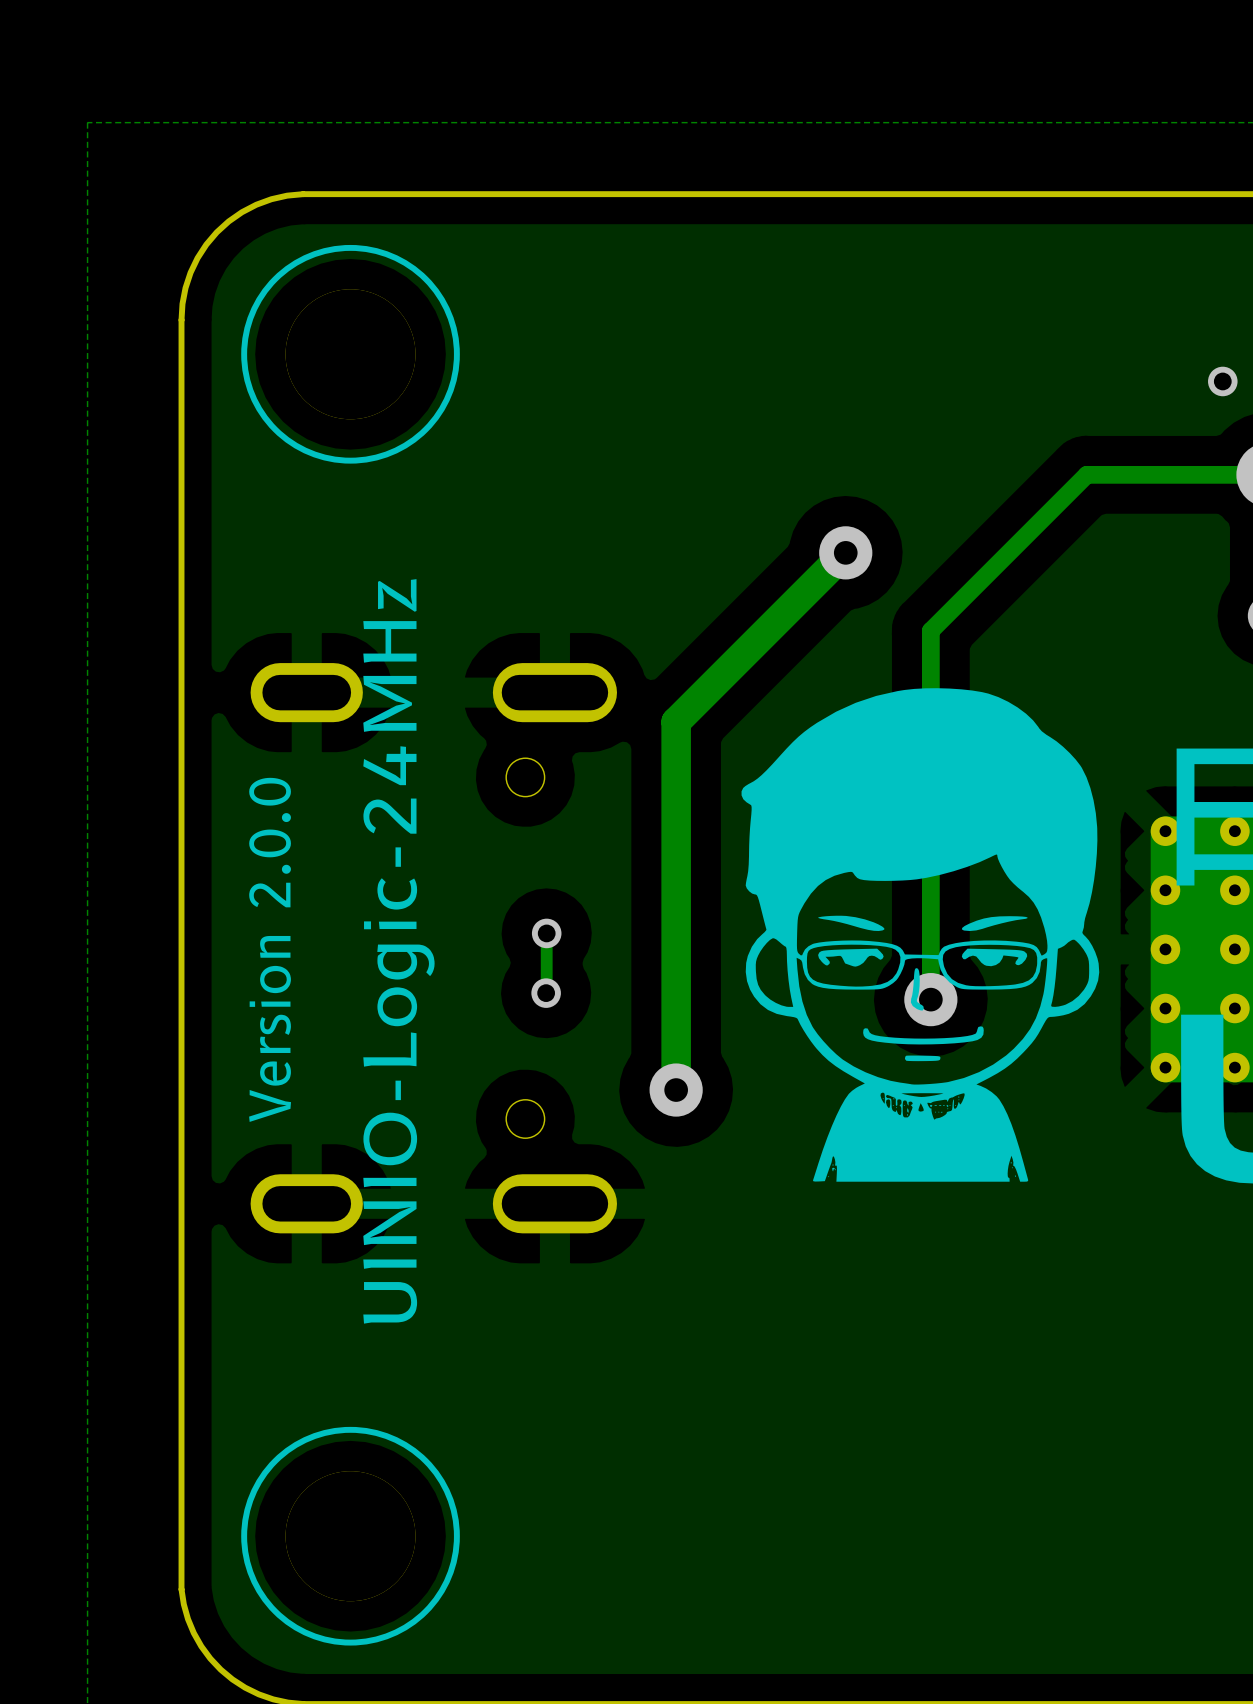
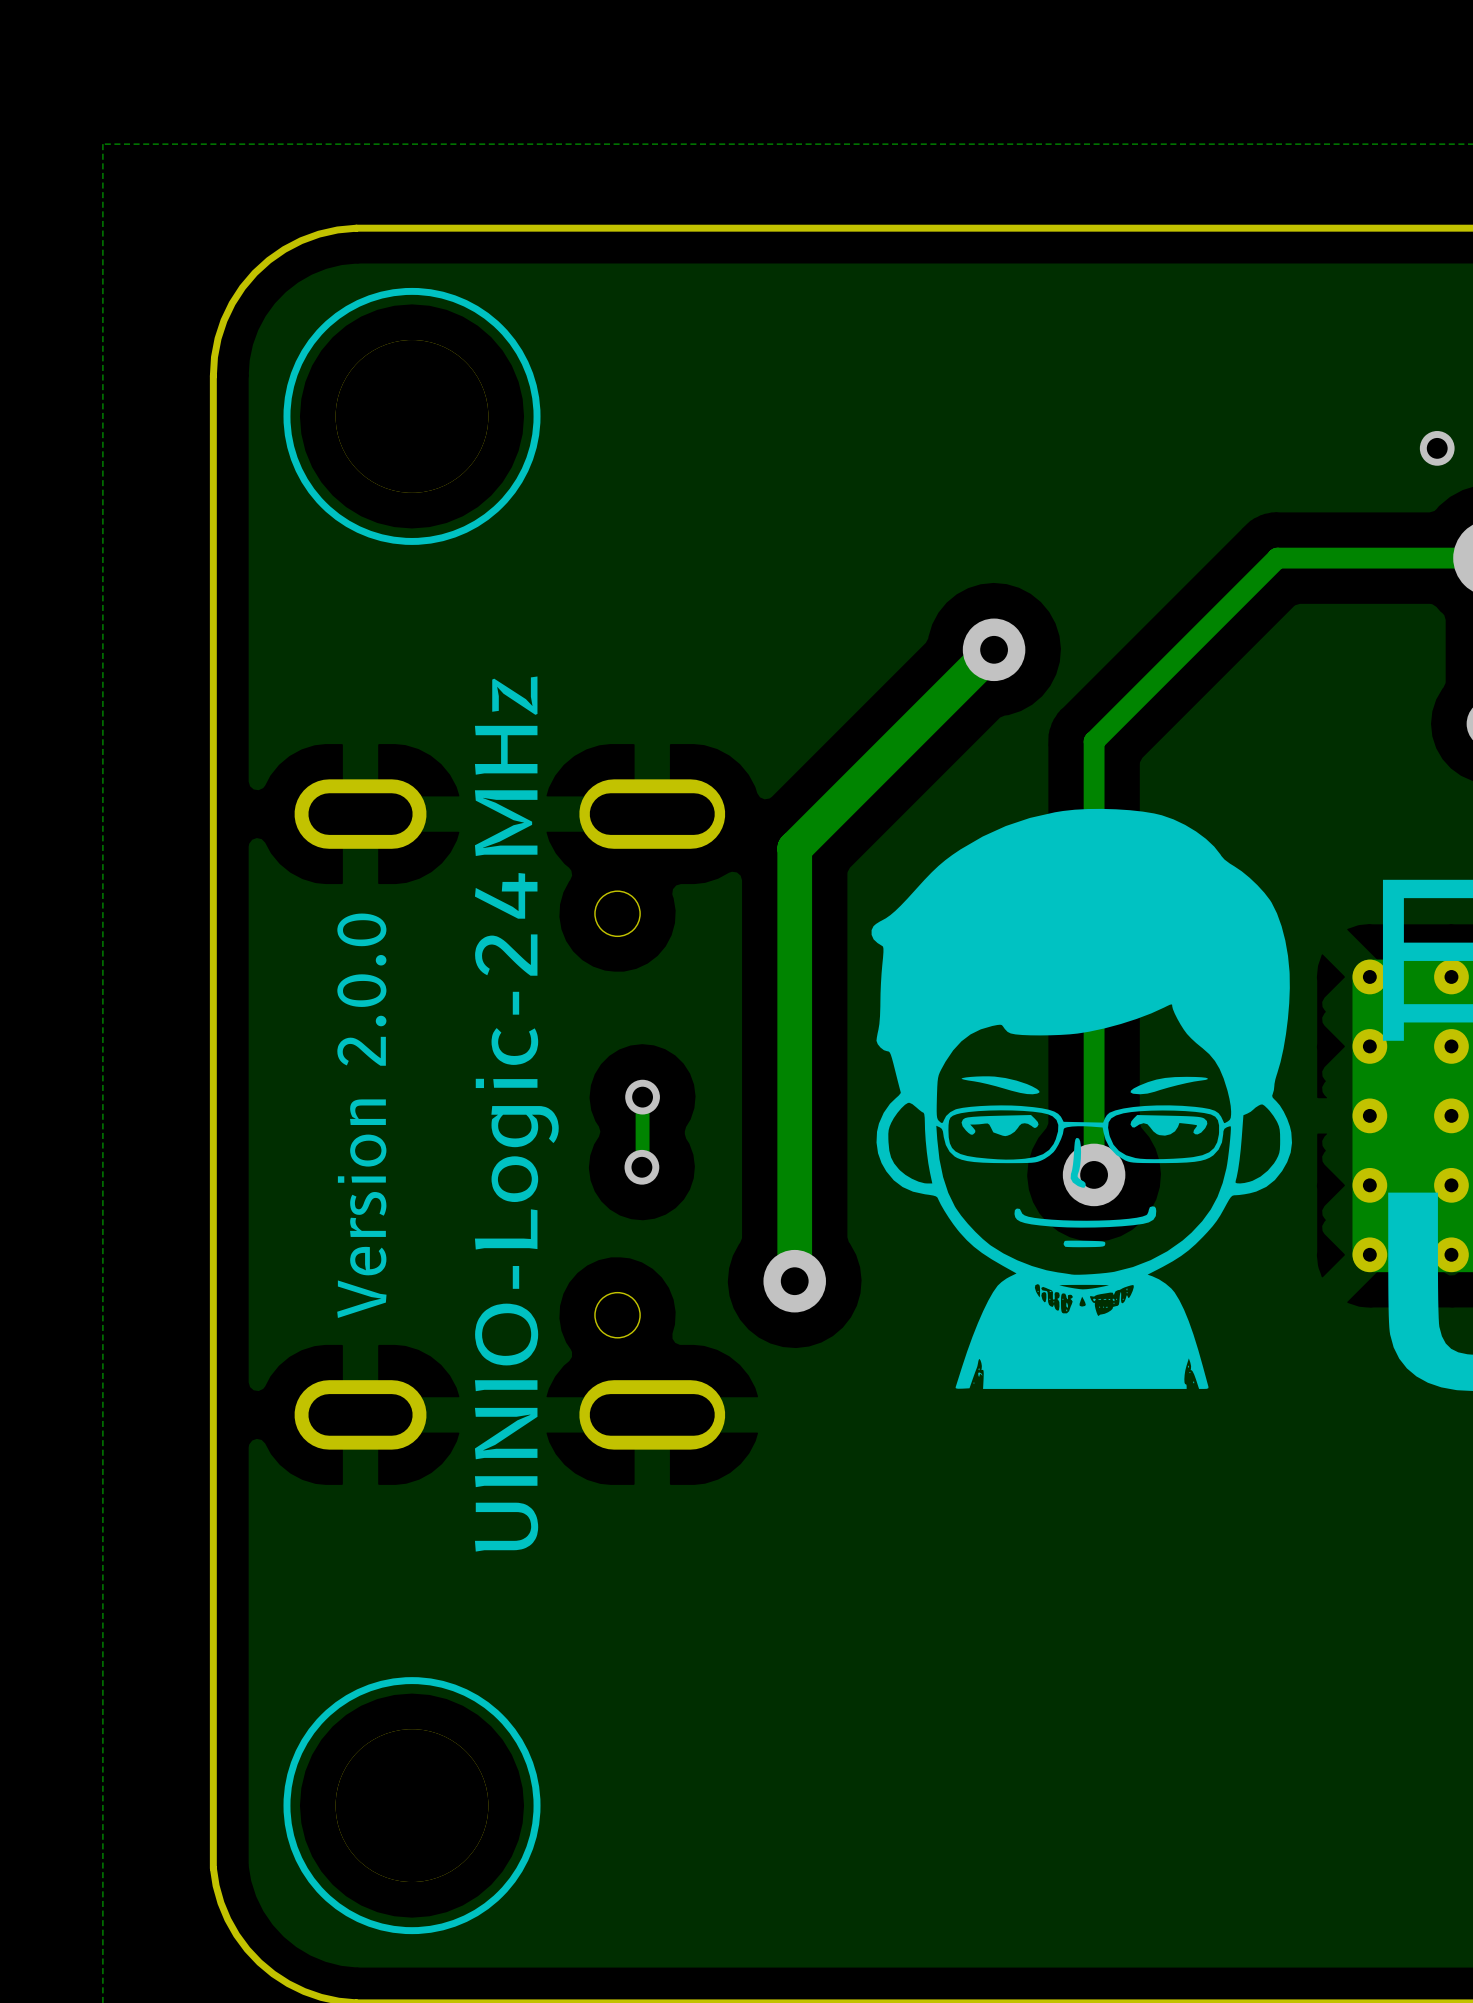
text position: Version 2.0.0 (270, 949) -> Version 2.0.0 (361, 1115)
text position: UINIO-Logic-24MHz (398, 951) -> UINIO-Logic-24MHz (516, 1114)

